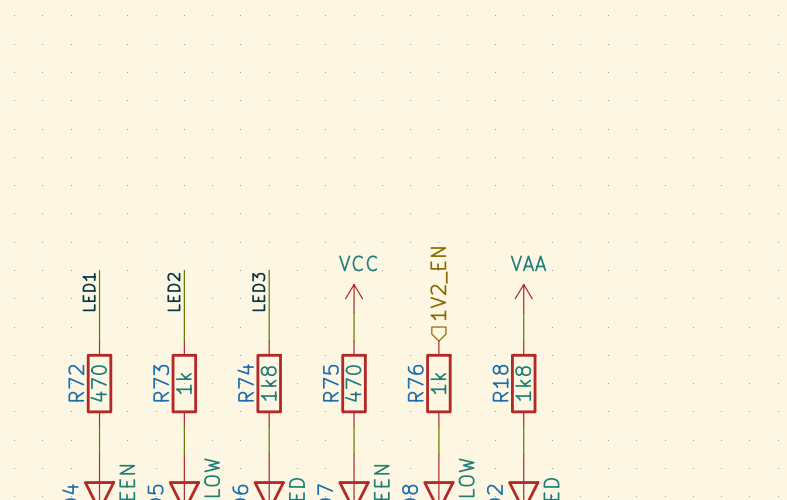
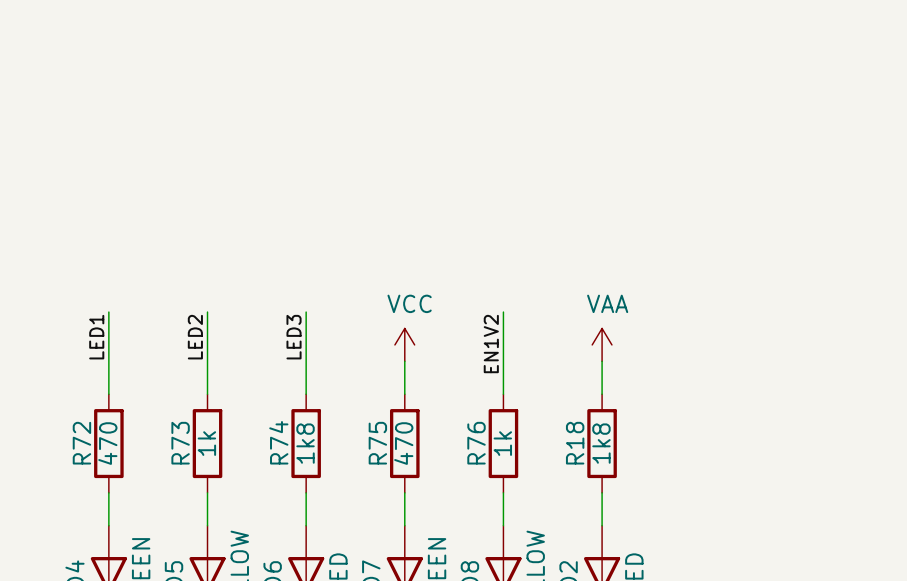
wire: none -> (503, 312) (503, 394)
hierarchical label: 1V2_EN (439, 283) -> none
label: none -> EN1V2 (491, 344)

